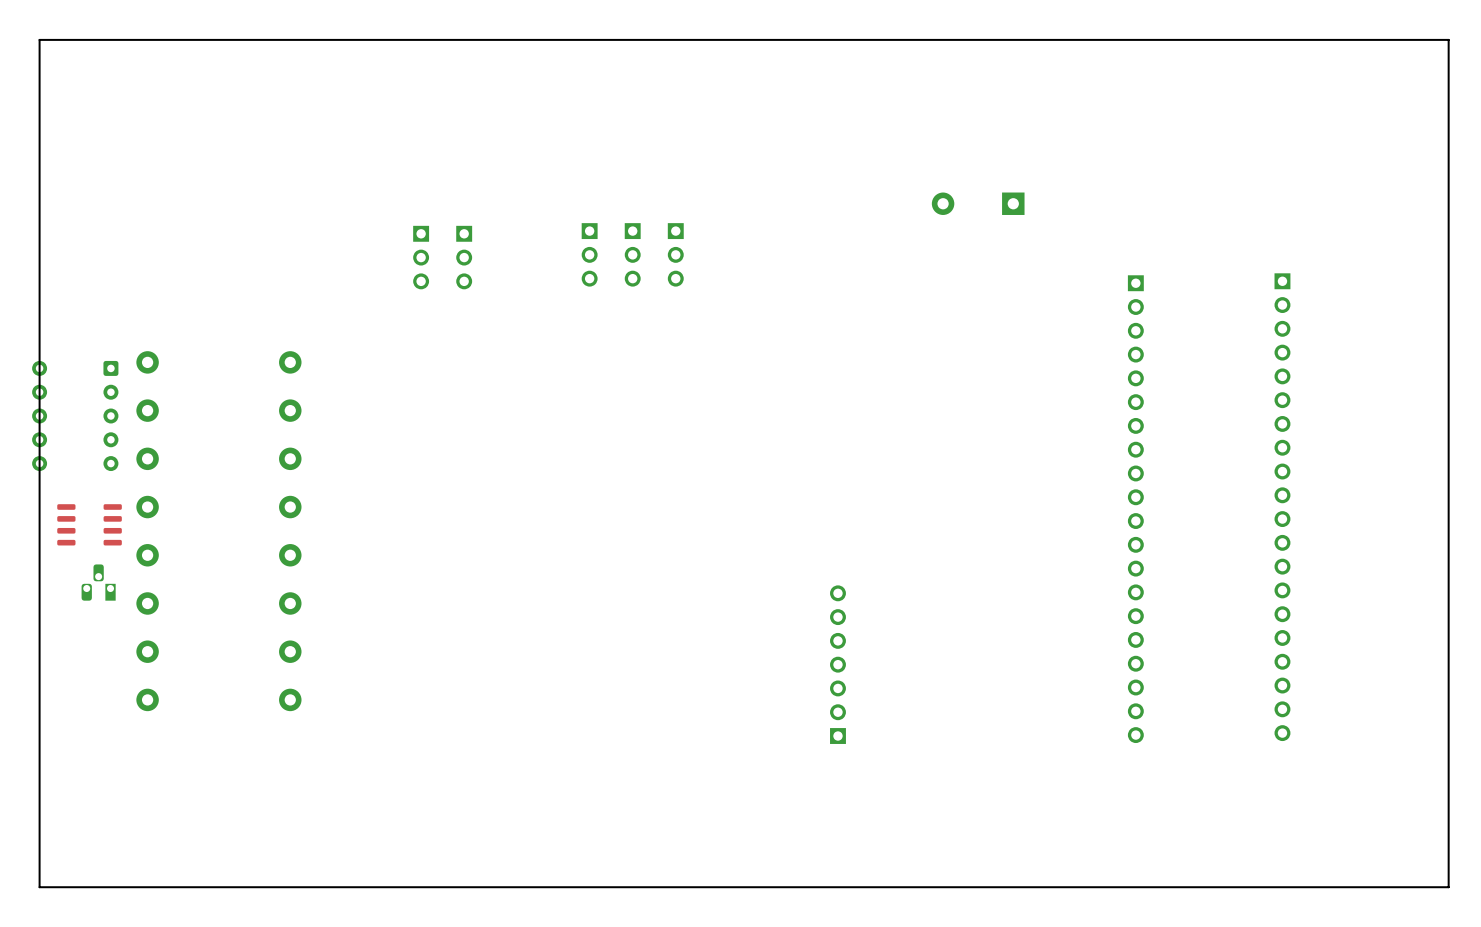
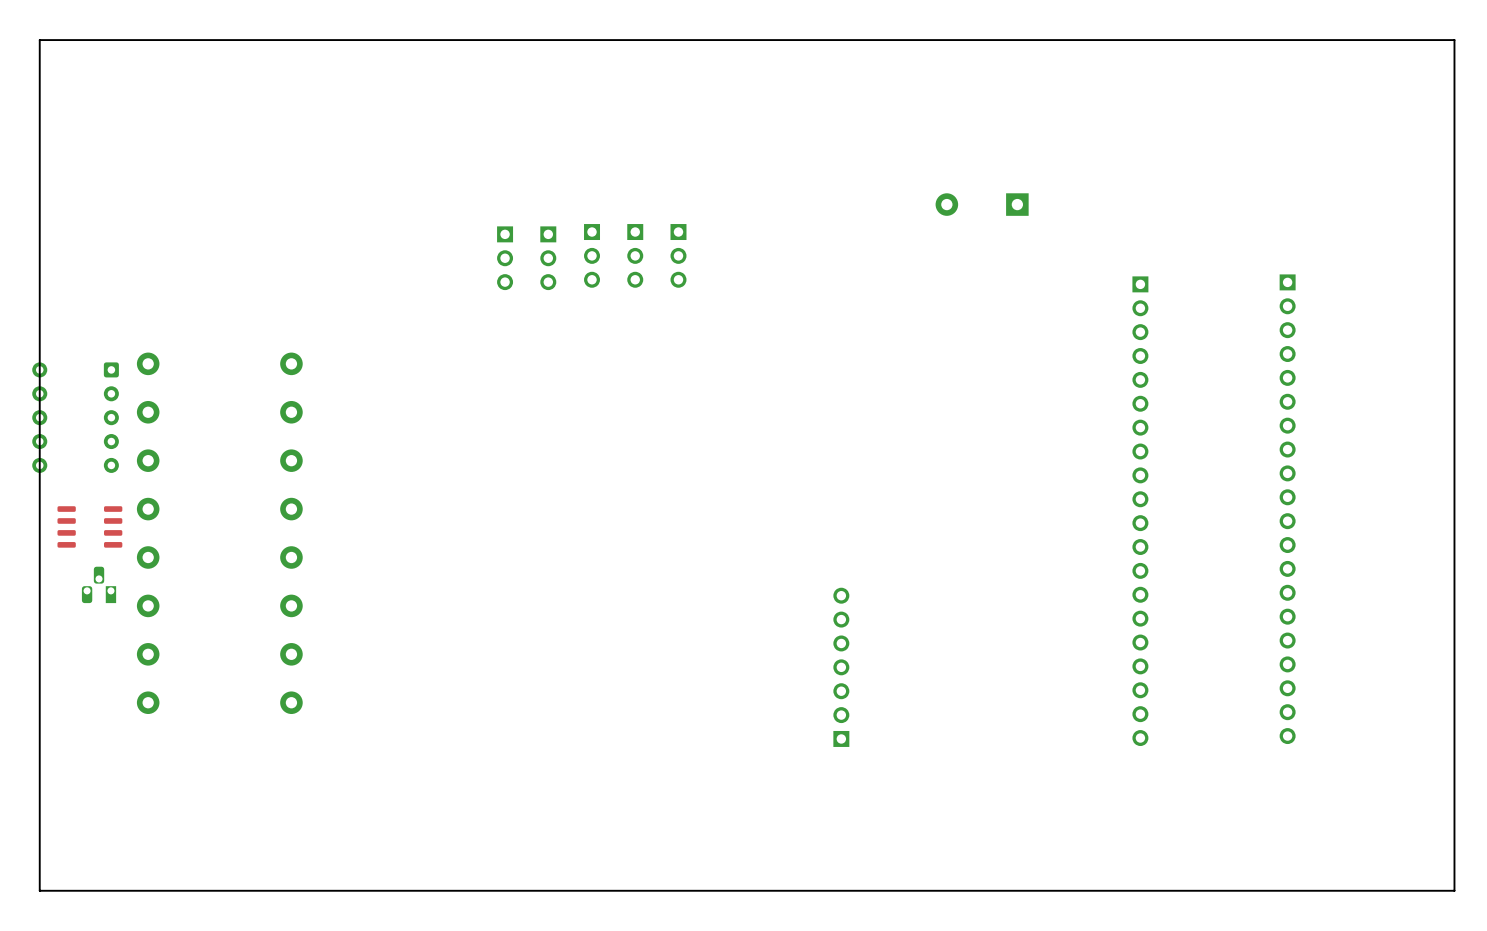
part: (421, 257) -> none
part position: (464, 257) -> (505, 258)
part: none -> (548, 258)

